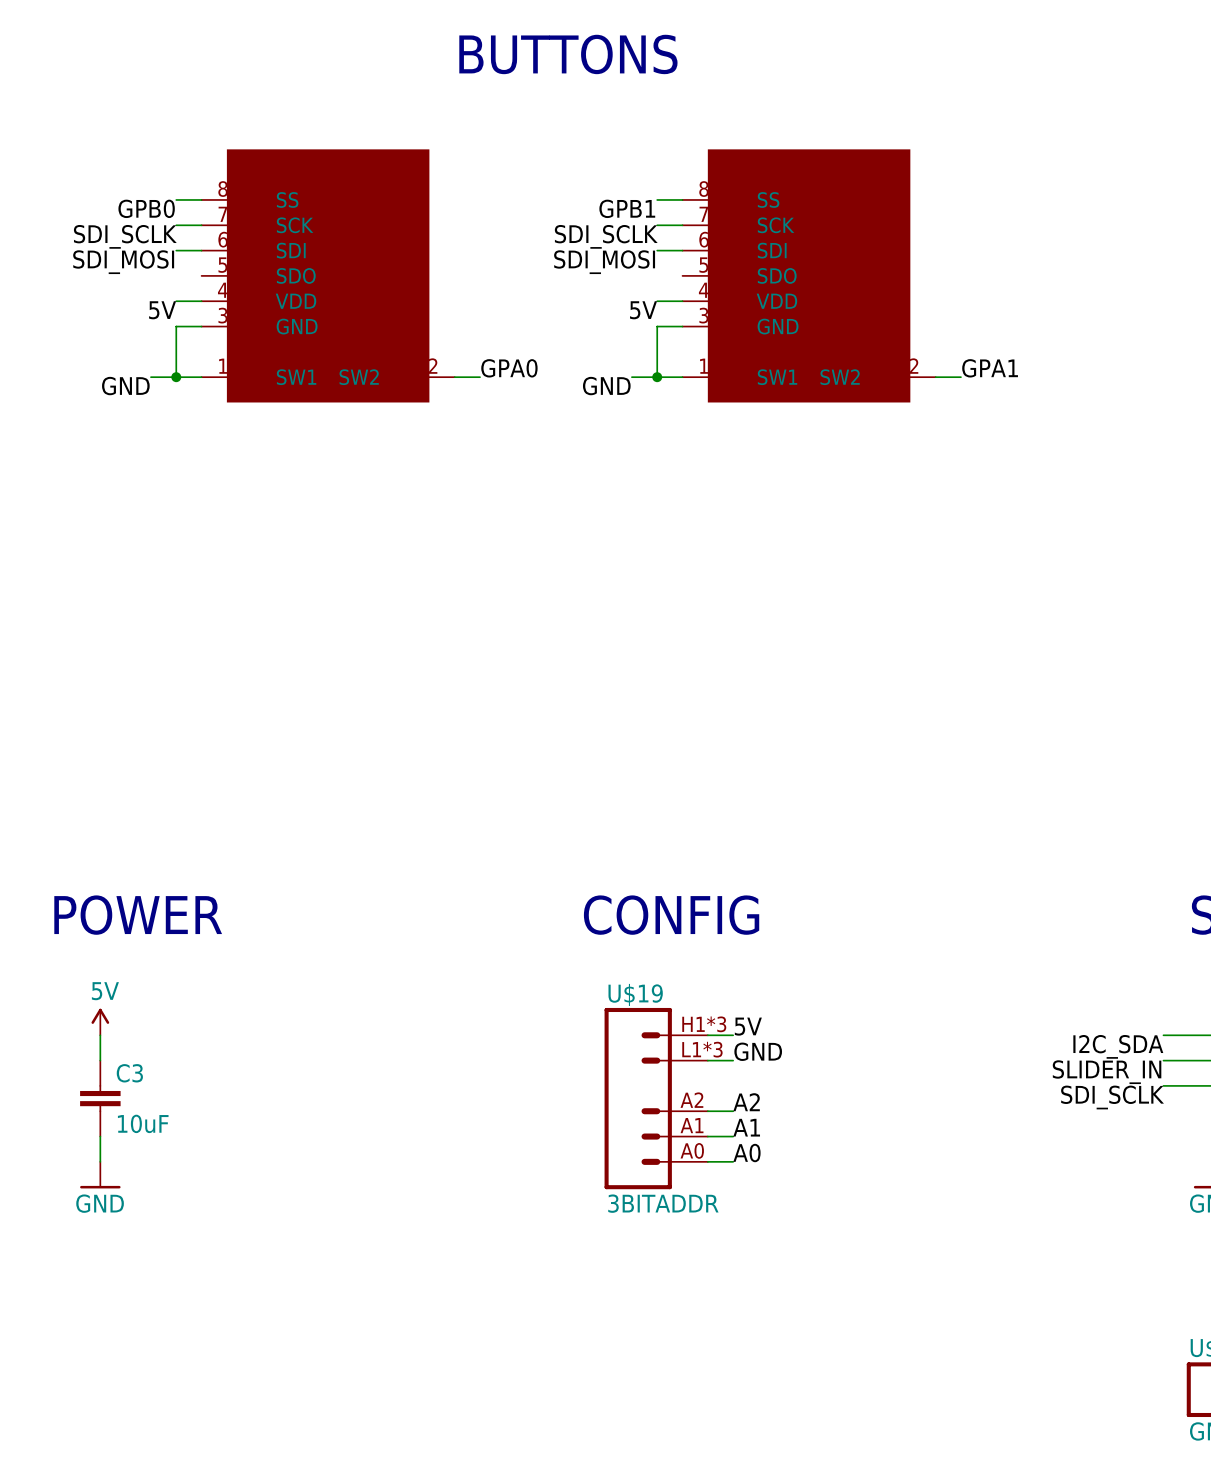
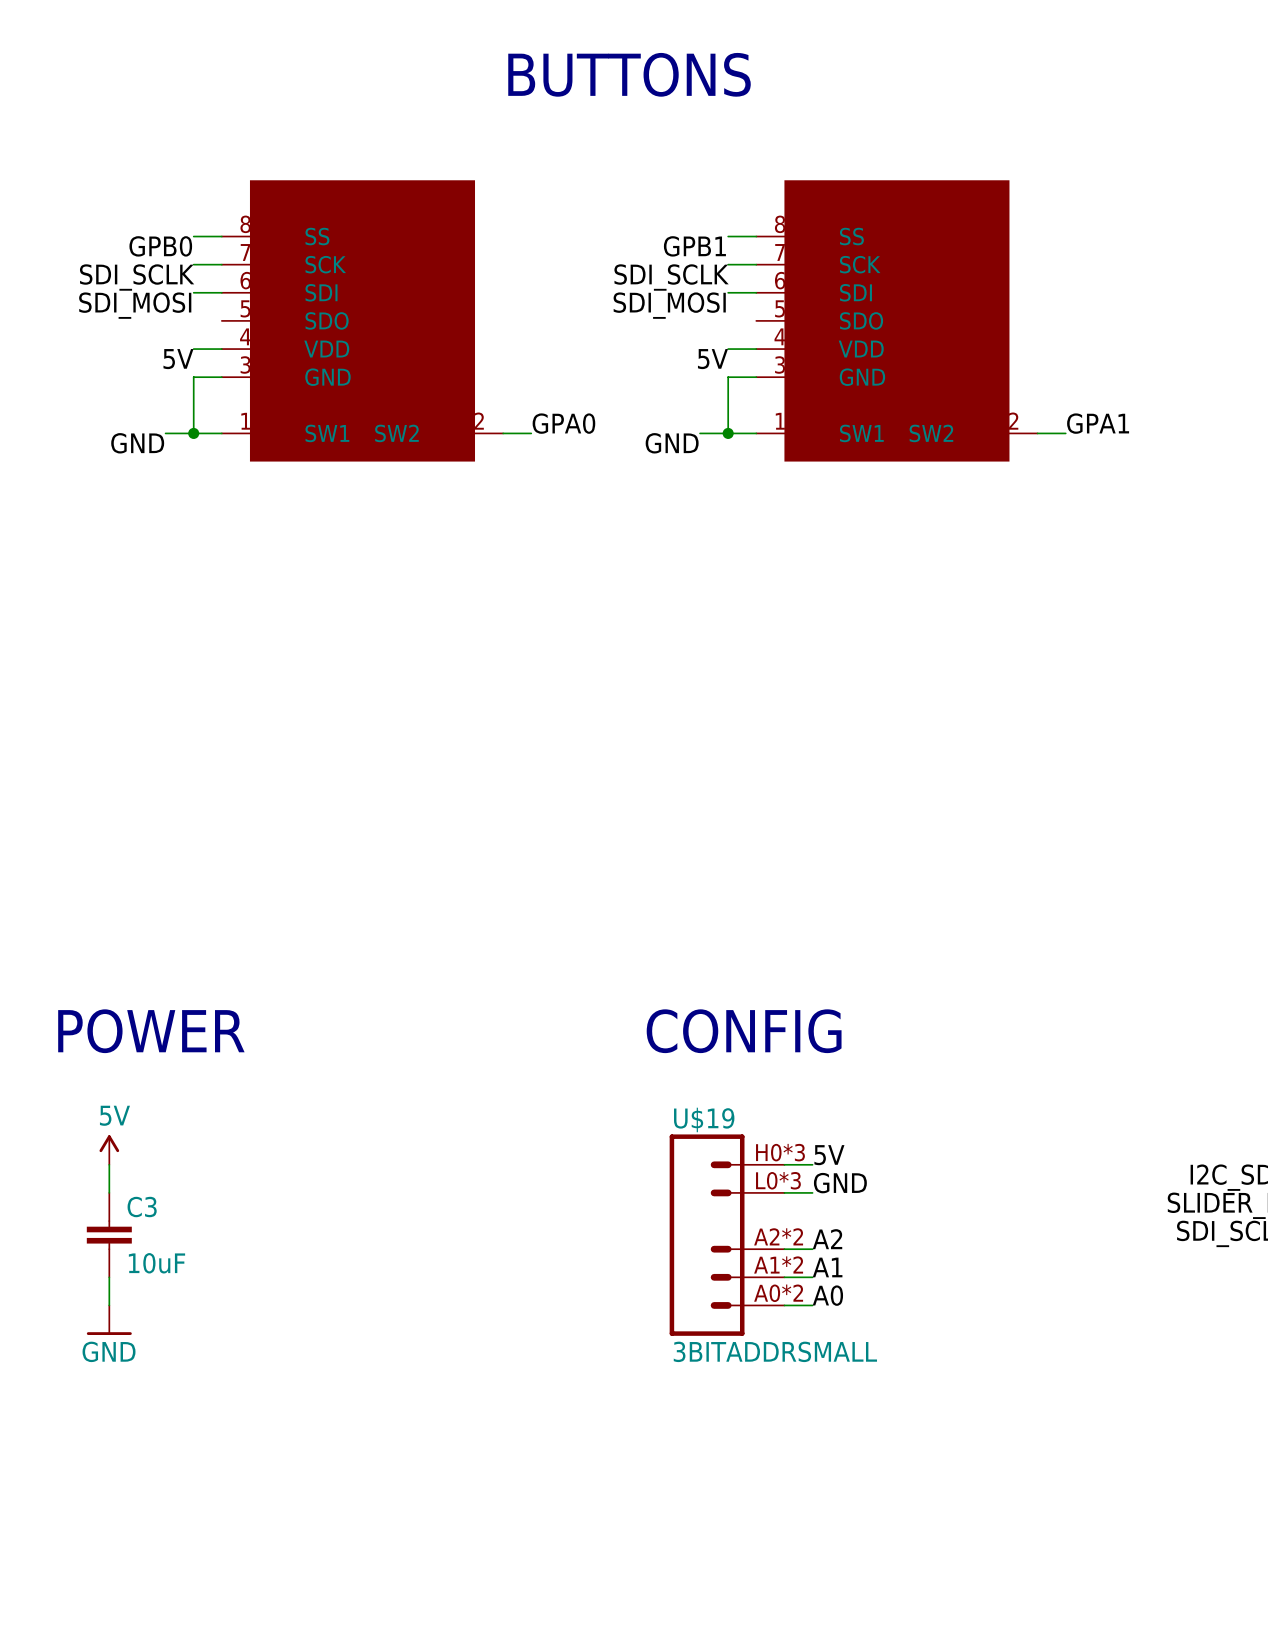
U$19 pin number: H1*3 (704, 1024) -> H0*3 (780, 1152)
U$19 pin number: L1*3 (702, 1049) -> L0*3 (778, 1180)
U$19 pin number: A2 (691, 1100) -> A2*2 (778, 1236)
U$19 pin number: A1 (692, 1125) -> A1*2 (778, 1264)
U$19 pin number: A0 (692, 1150) -> A0*2 (778, 1293)
U$19 value: 3BITADDR (663, 1203) -> 3BITADDRSMALL (775, 1351)

